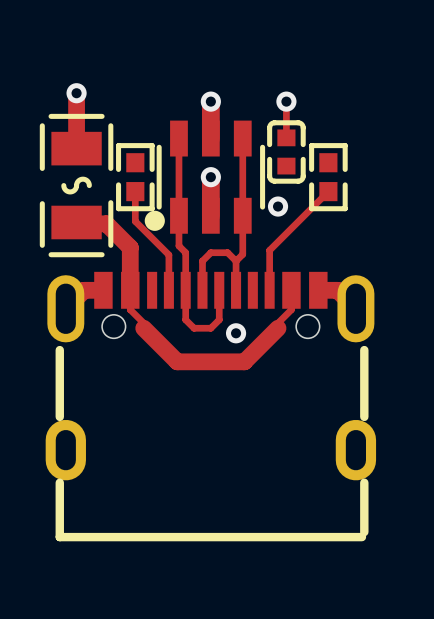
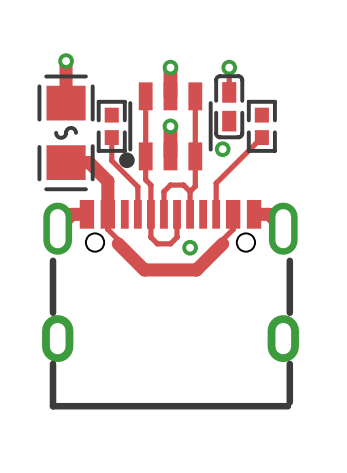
part footprint: [39, 113, 114, 258] -> [37, 74, 95, 192]
part footprint: [267, 120, 306, 184] -> [214, 74, 245, 140]

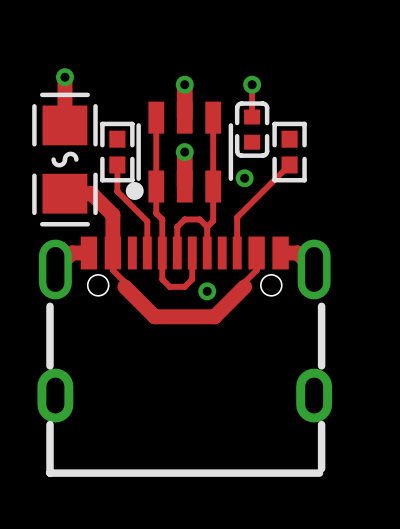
part footprint: [214, 74, 245, 140] -> [234, 101, 270, 158]

